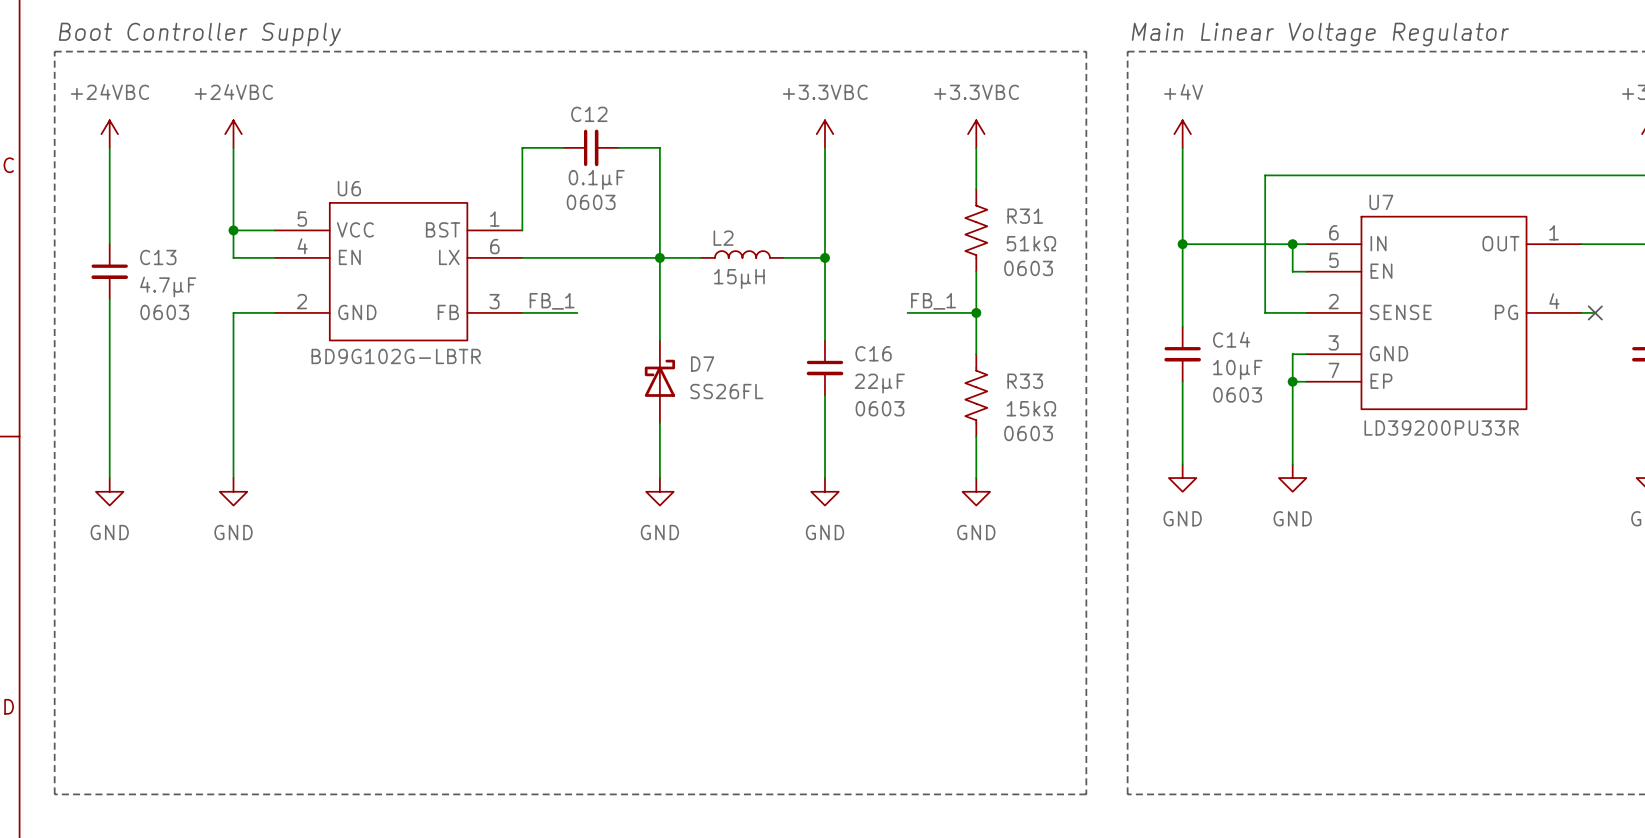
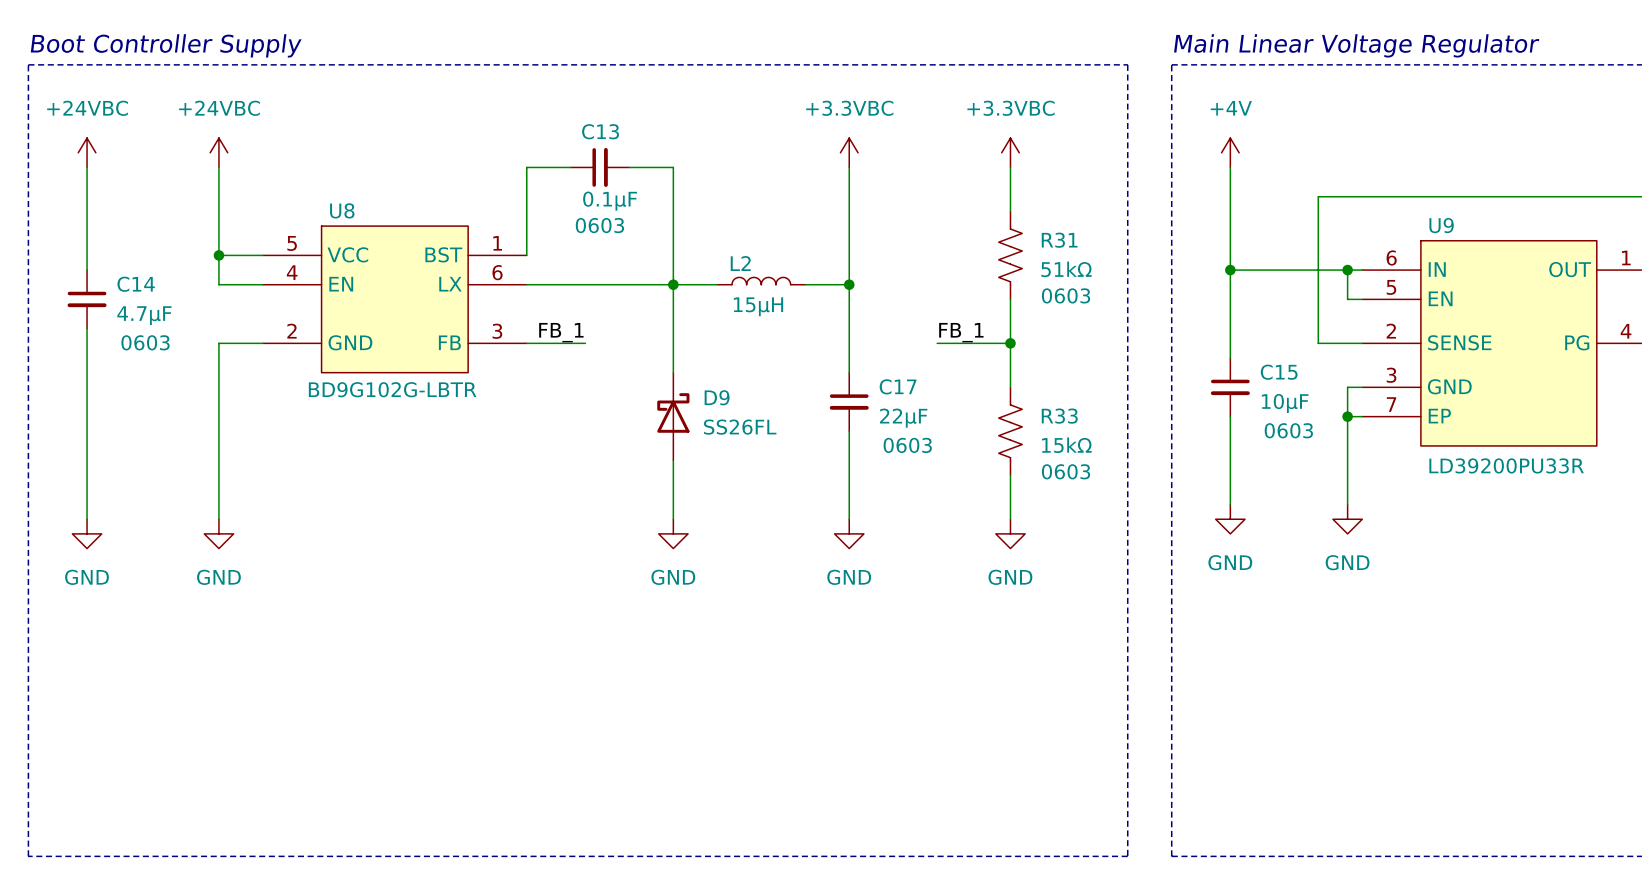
C12 name: C12 (589, 114) -> C13 (600, 131)
U6 name: U6 (349, 188) -> U8 (342, 210)
U7 name: U7 (1381, 202) -> U9 (1441, 225)
C13 name: C13 (158, 257) -> C14 (136, 284)
C14 name: C14 (1231, 339) -> C15 (1279, 372)
C16 name: C16 (873, 353) -> C17 (898, 386)
D7 name: D7 (702, 364) -> D9 (717, 397)

